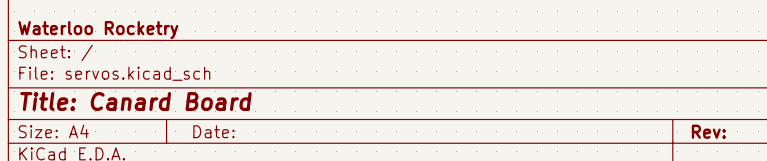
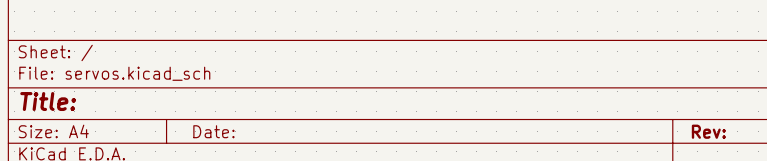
title block: Waterloo Rocketry (98, 30) -> none
title block: Title: Canard Board (135, 101) -> Title: (48, 101)

